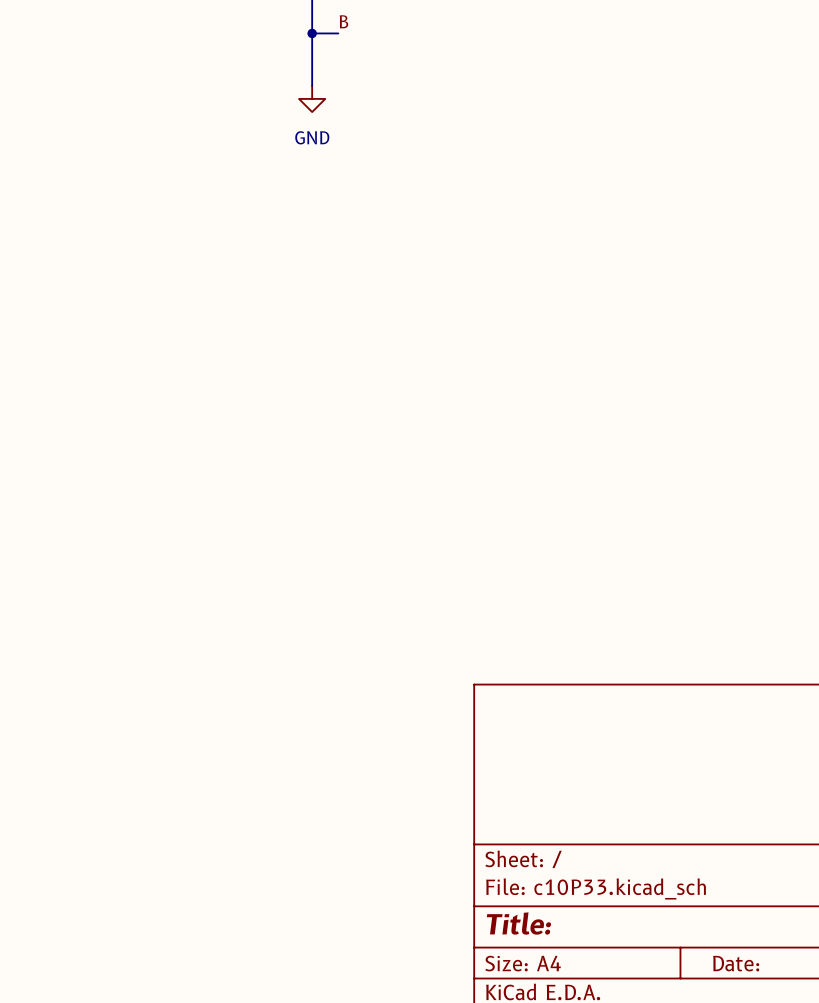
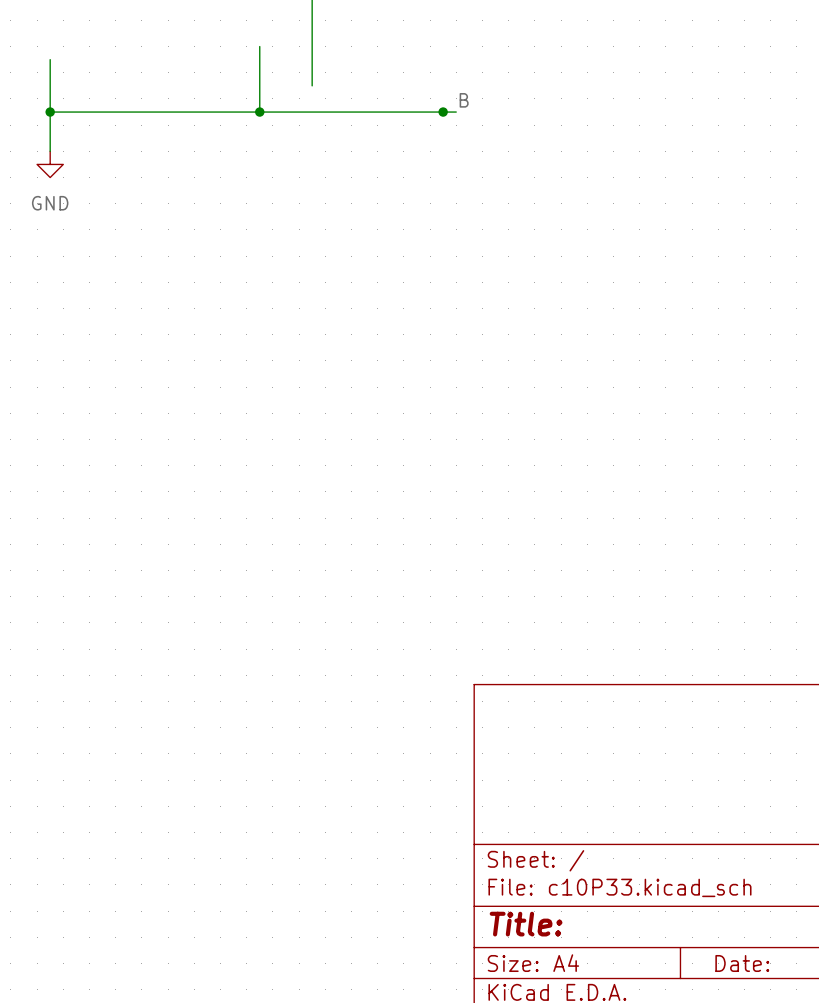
label position: B (343, 21) -> B (464, 100)
wire: (312, 33) (338, 33) -> none
junction: (312, 33) -> none
wire: none -> (259, 46) (259, 112)
wire: none -> (50, 59) (50, 151)
power symbol: GND (312, 98) -> none
wire: none -> (50, 112) (456, 112)
junction: none -> (50, 112)
junction: none -> (259, 112)
junction: none -> (443, 112)
power symbol: none -> GND (50, 164)

